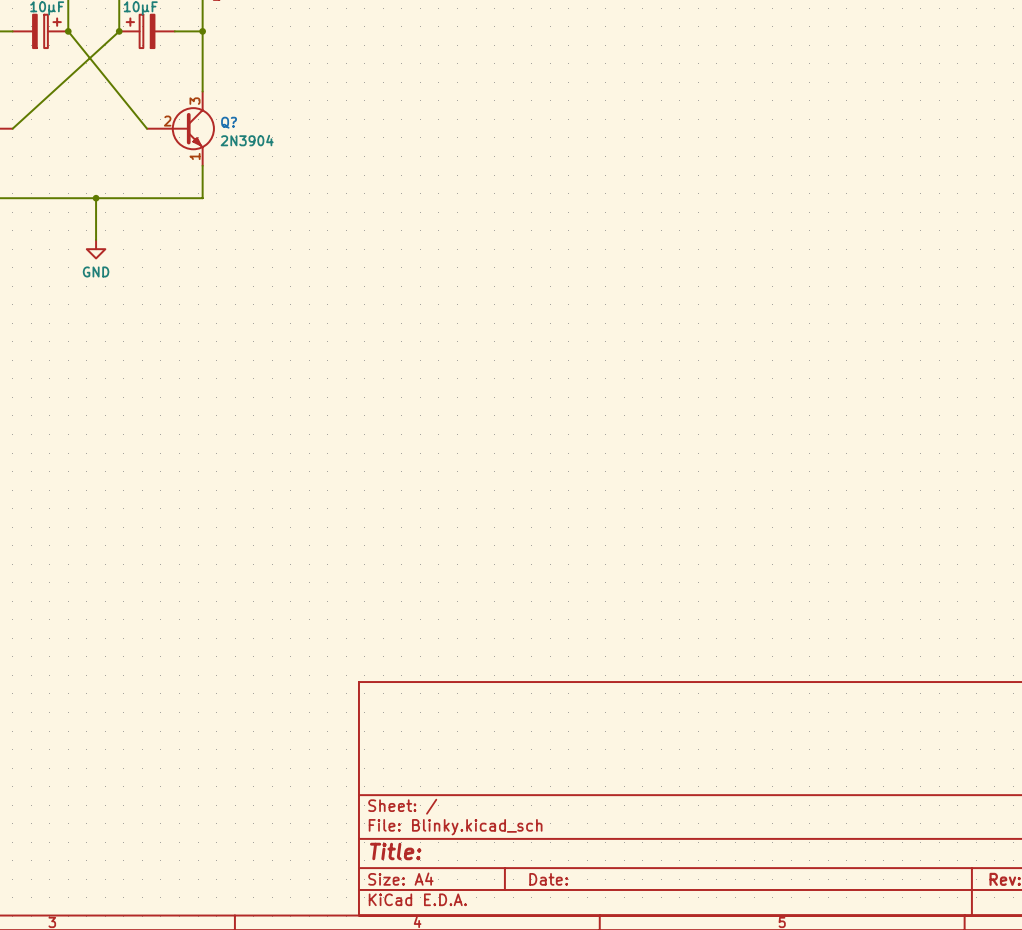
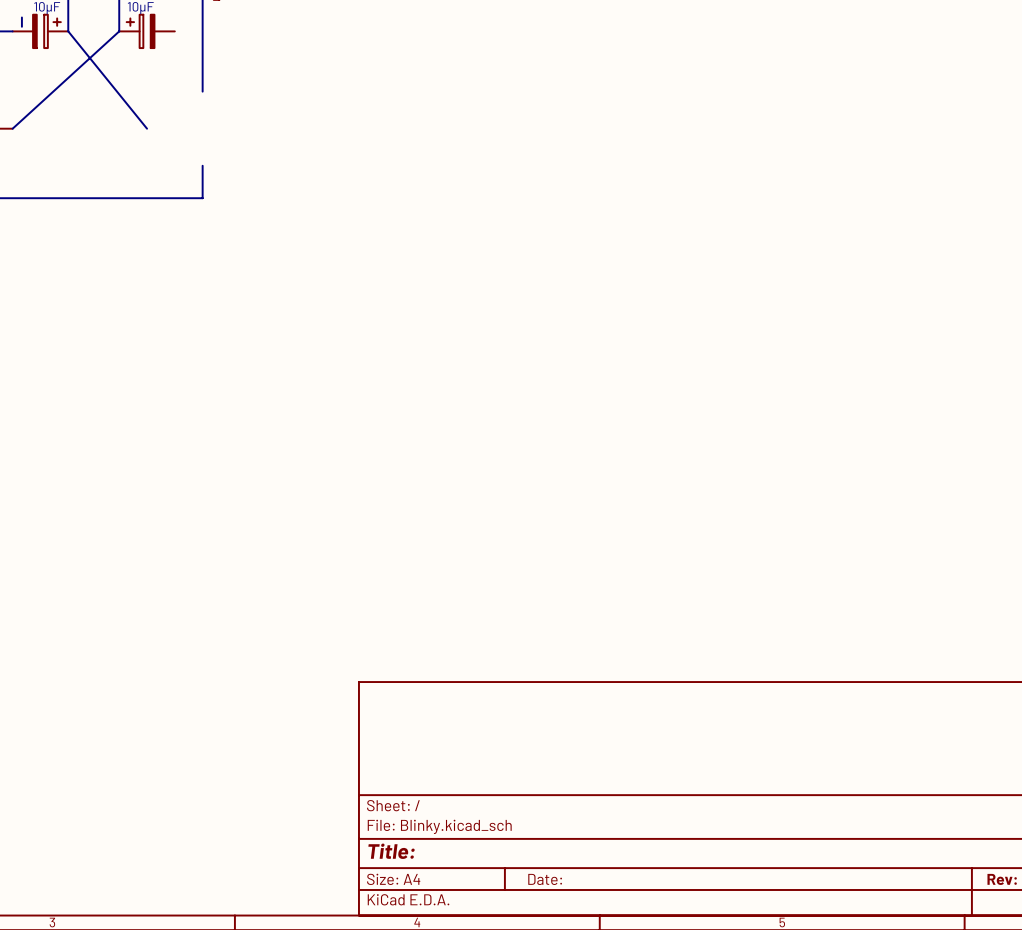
wire: none -> (21, 17) (21, 26)
junction: (68, 31) -> none
junction: (119, 31) -> none
wire: (174, 31) (202, 31) -> none
junction: (202, 31) -> none
Q?: 2N3904 (180, 128) -> none
wire: (96, 198) (96, 239) -> none
junction: (96, 198) -> none
power symbol: GND (96, 249) -> none

